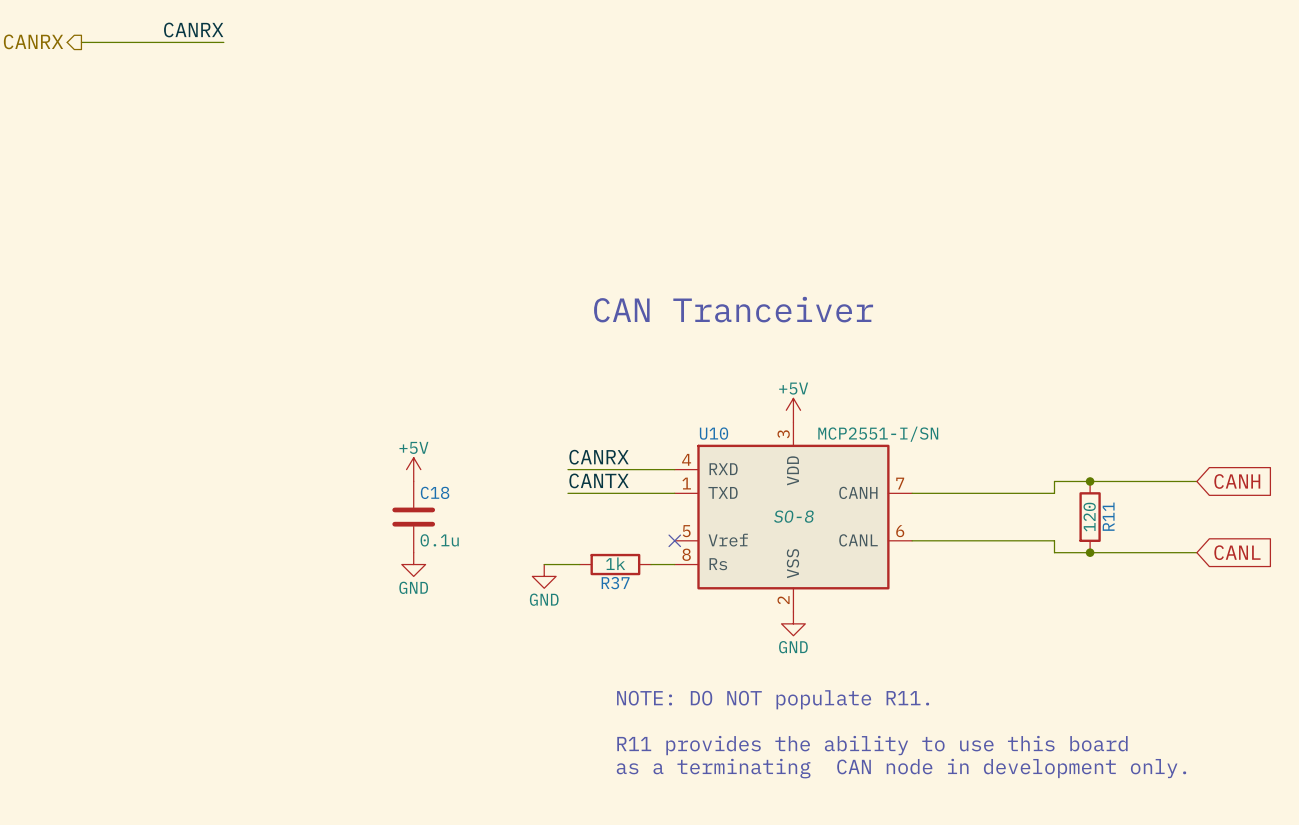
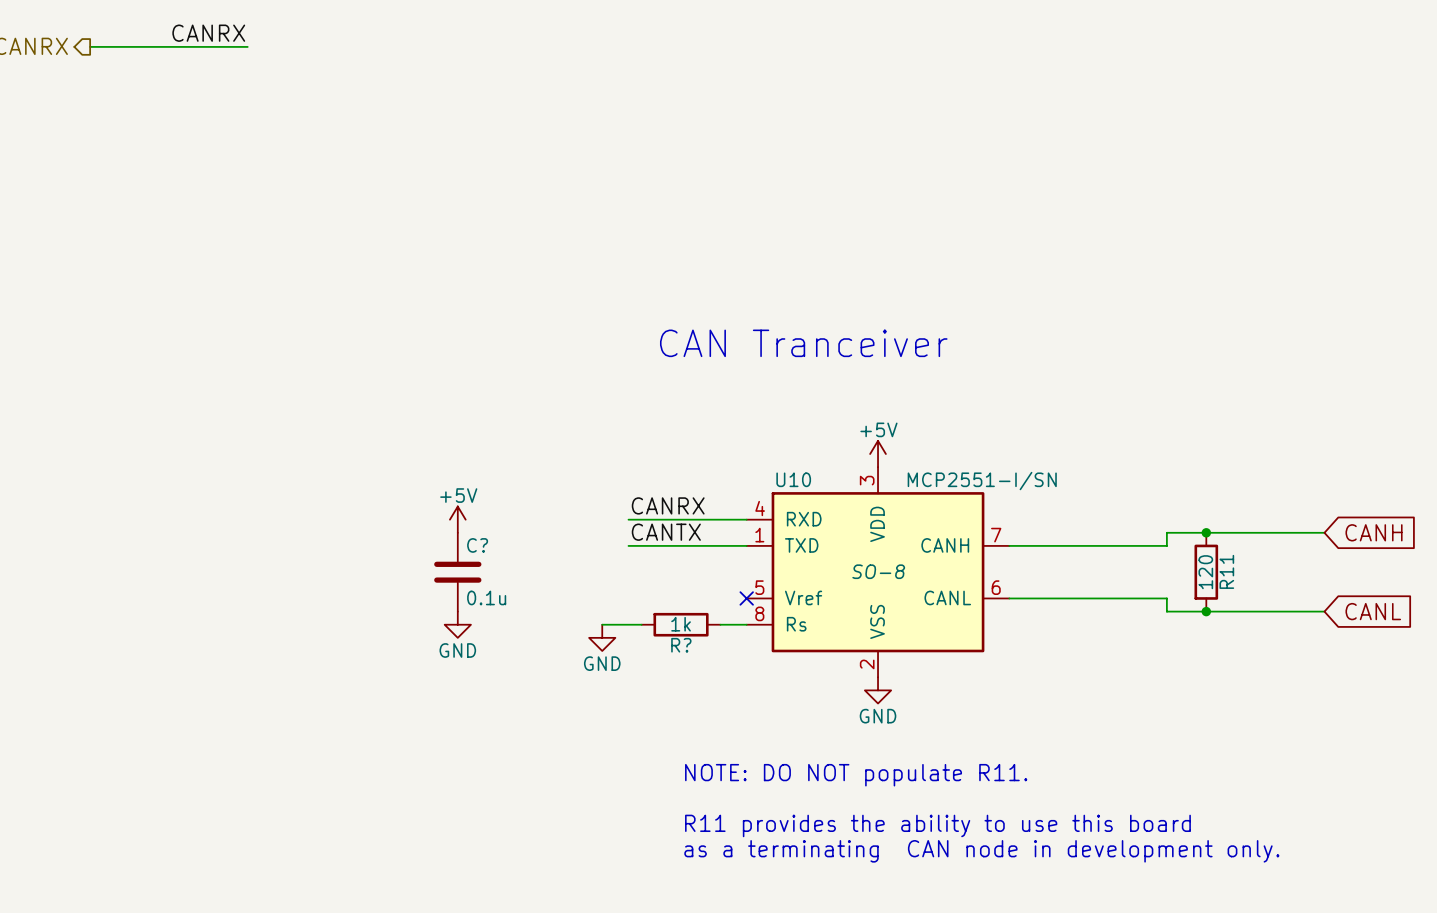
C18 name: C18 (435, 492) -> C? (477, 545)
R37 name: R37 (615, 583) -> R? (681, 645)

